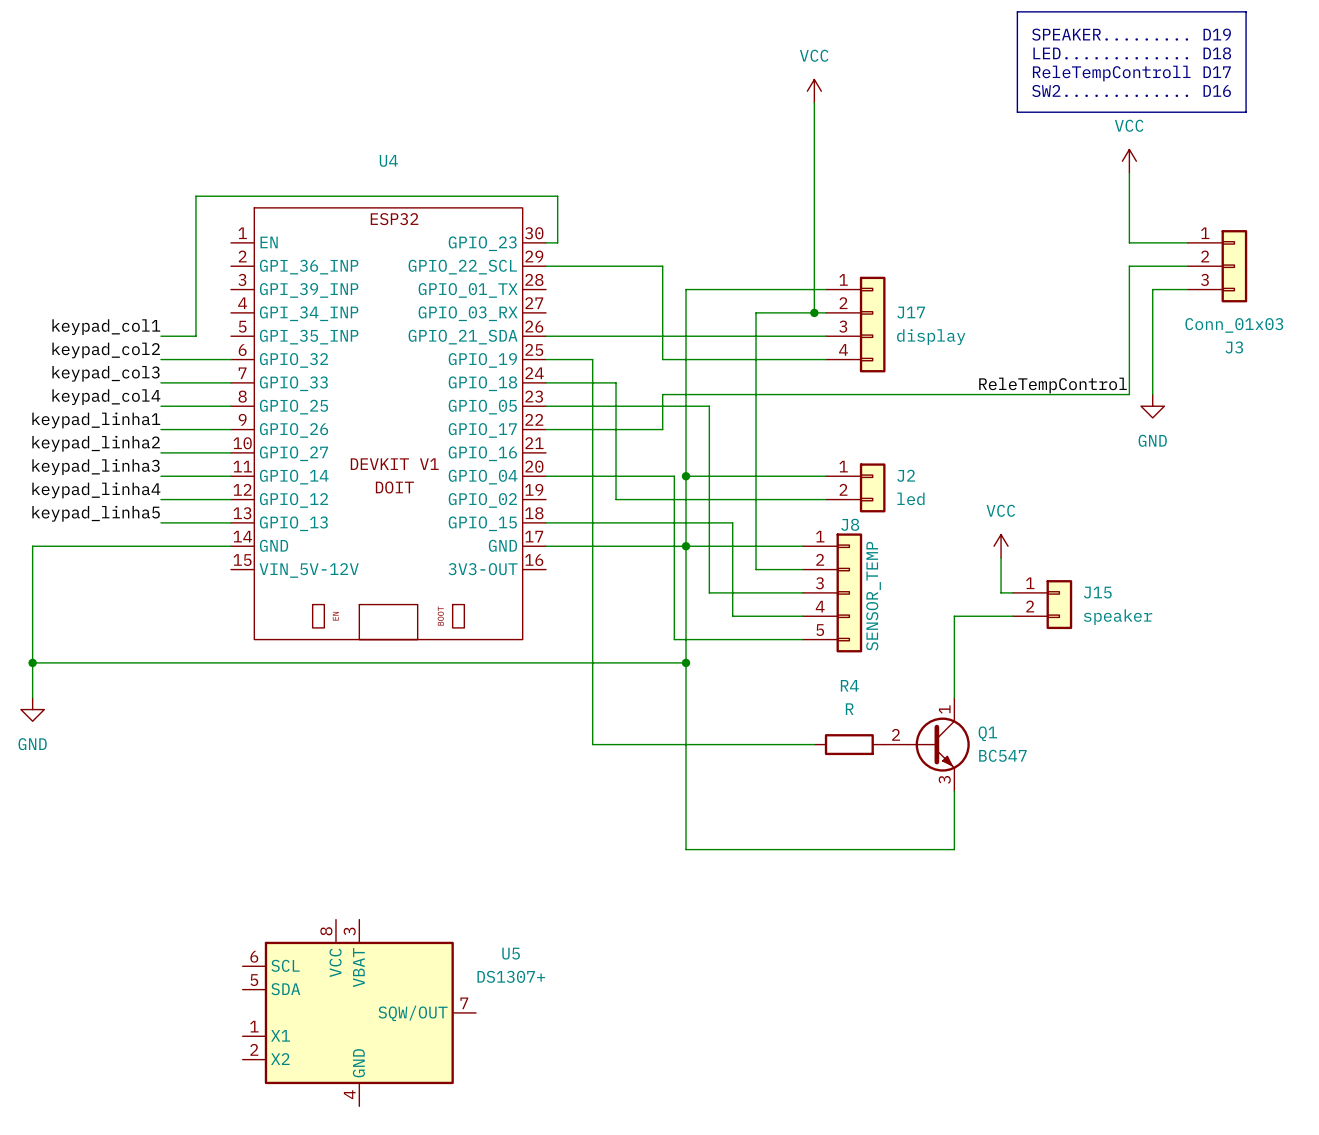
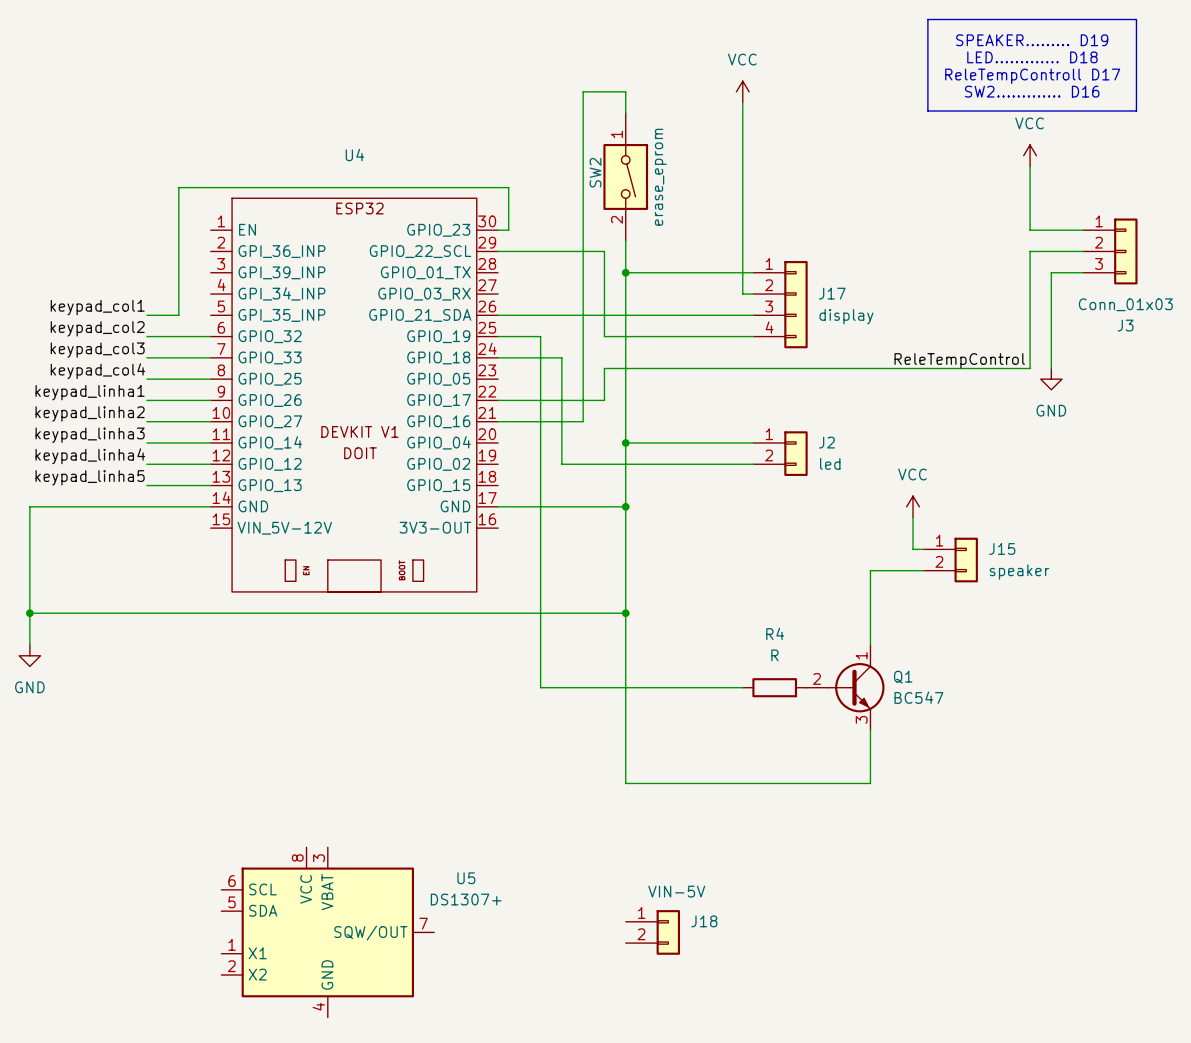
wire: none -> (625, 113) (625, 91) (583, 91) (583, 421) (498, 421)
SW2: none -> erase_eprom (625, 176)
wire: none -> (625, 240) (625, 272)
junction: none -> (625, 272)
wire: (814, 312) (756, 312) (756, 569) (802, 569) -> none
junction: (814, 312) -> none
wire: (546, 406) (709, 406) (709, 592) (802, 592) -> none
wire: (546, 476) (674, 476) (674, 639) (802, 639) -> none
wire: (546, 522) (732, 522) (732, 616) (802, 616) -> none
wire: (686, 546) (802, 546) -> none
J8: SENSOR_TEMP (832, 592) -> none
J18: none -> VIN-5V (652, 932)

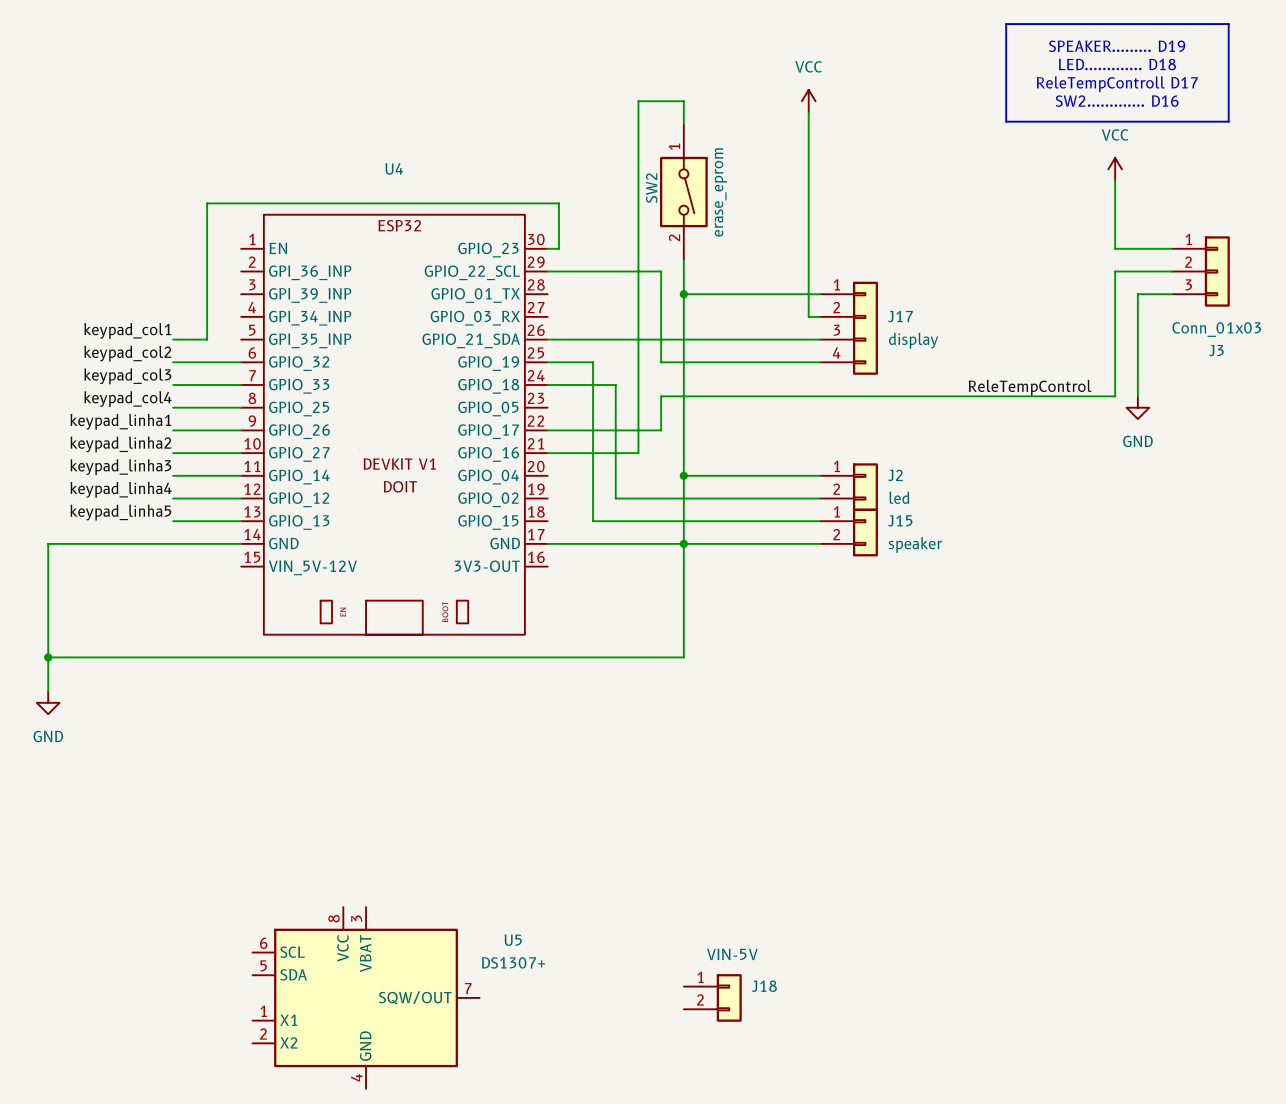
wire: (540, 485) (540, 687) (742, 687) -> (593, 521) (820, 521)
wire: none -> (683, 543) (820, 543)
power symbol: VCC (913, 506) -> none
wire: (913, 517) (913, 549) (923, 549) -> none
J15 position: (950, 560) -> (848, 532)
wire: (923, 570) (870, 570) (870, 645) -> none
wire: (625, 613) (625, 783) (870, 783) (870, 730) -> none
junction: (625, 613) -> none
R4: R (774, 687) -> none
Q1: BC547 (845, 687) -> none

